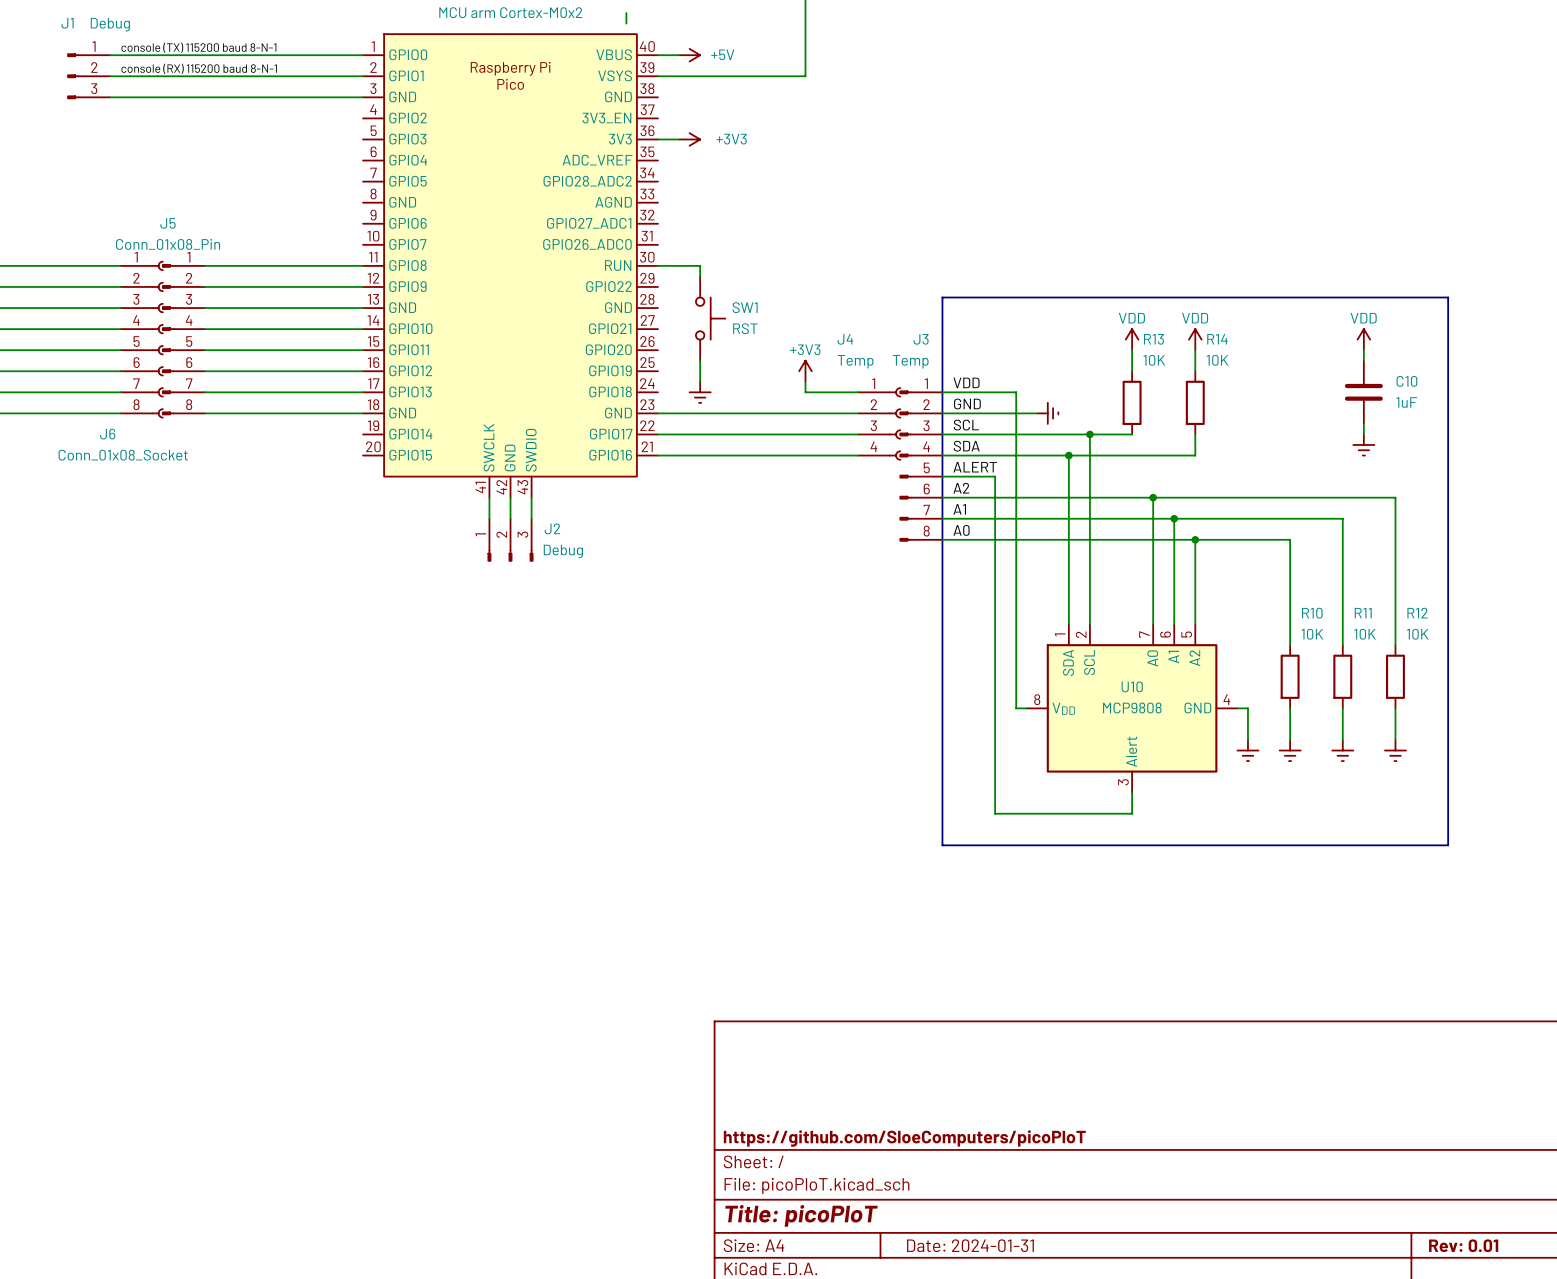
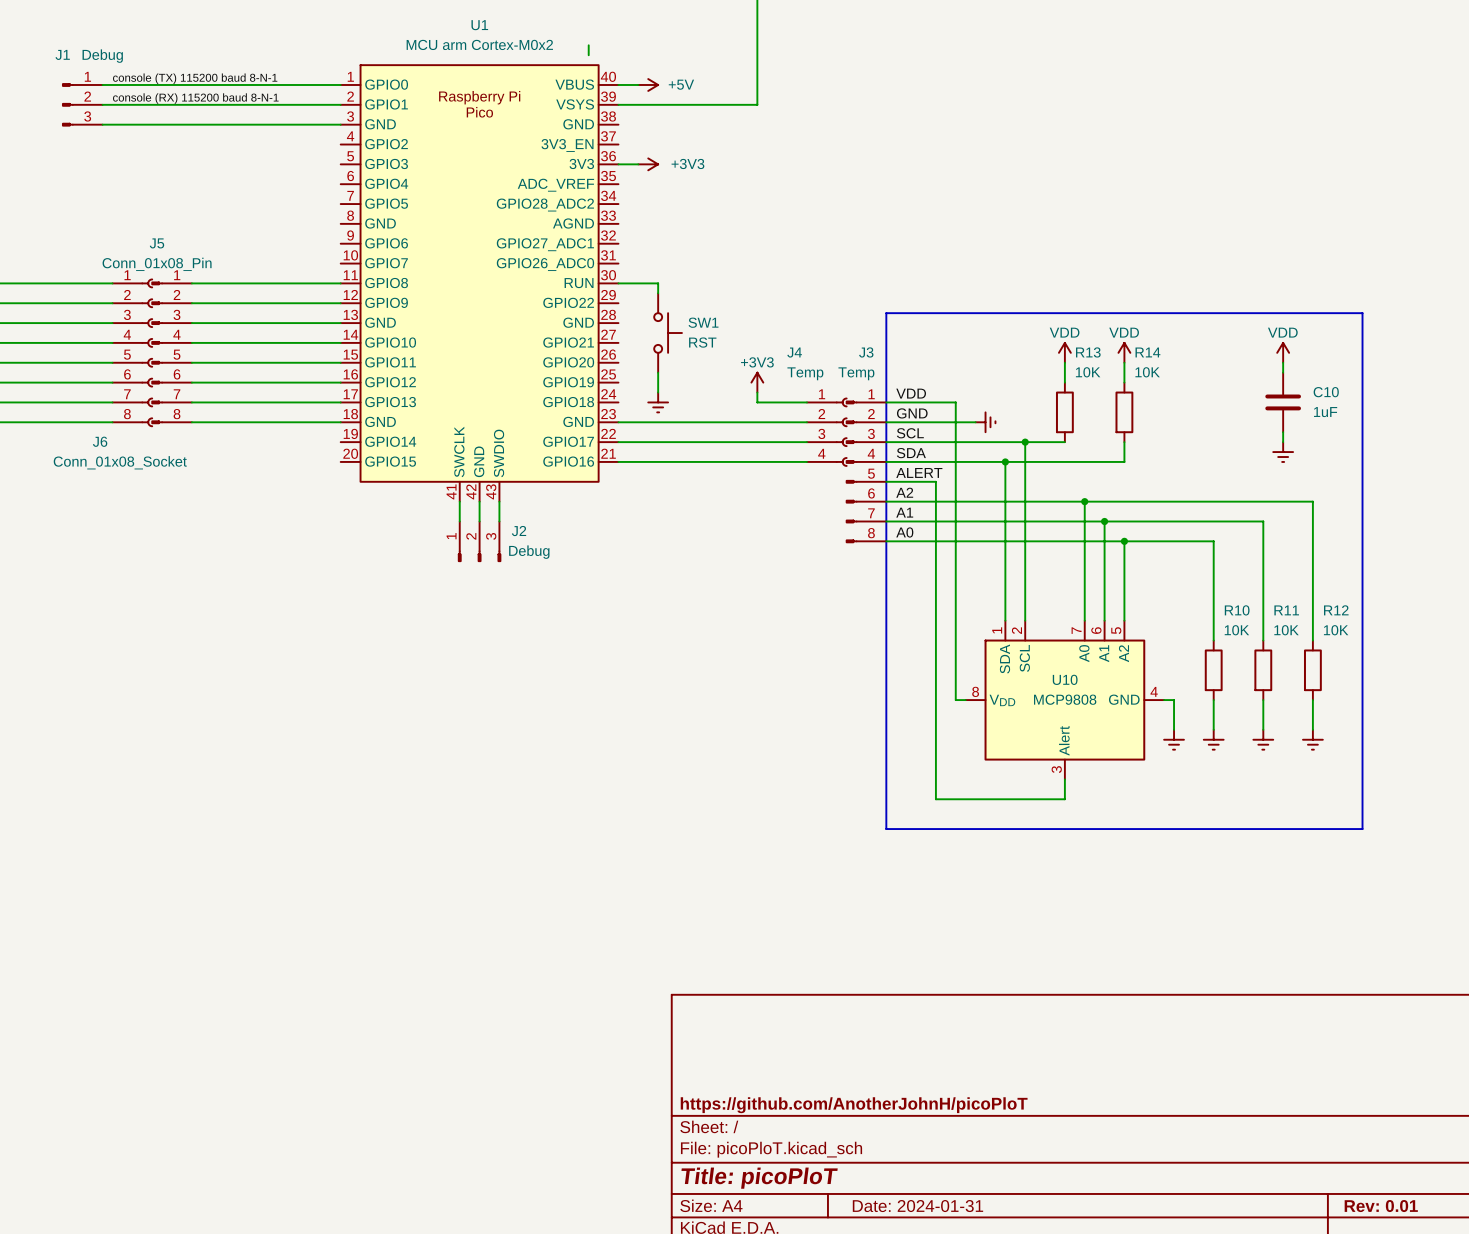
title block: https://github.com/SloeComputers/picoPloT (904, 1138) -> https://github.com/AnotherJohnH/picoPloT (854, 1105)

